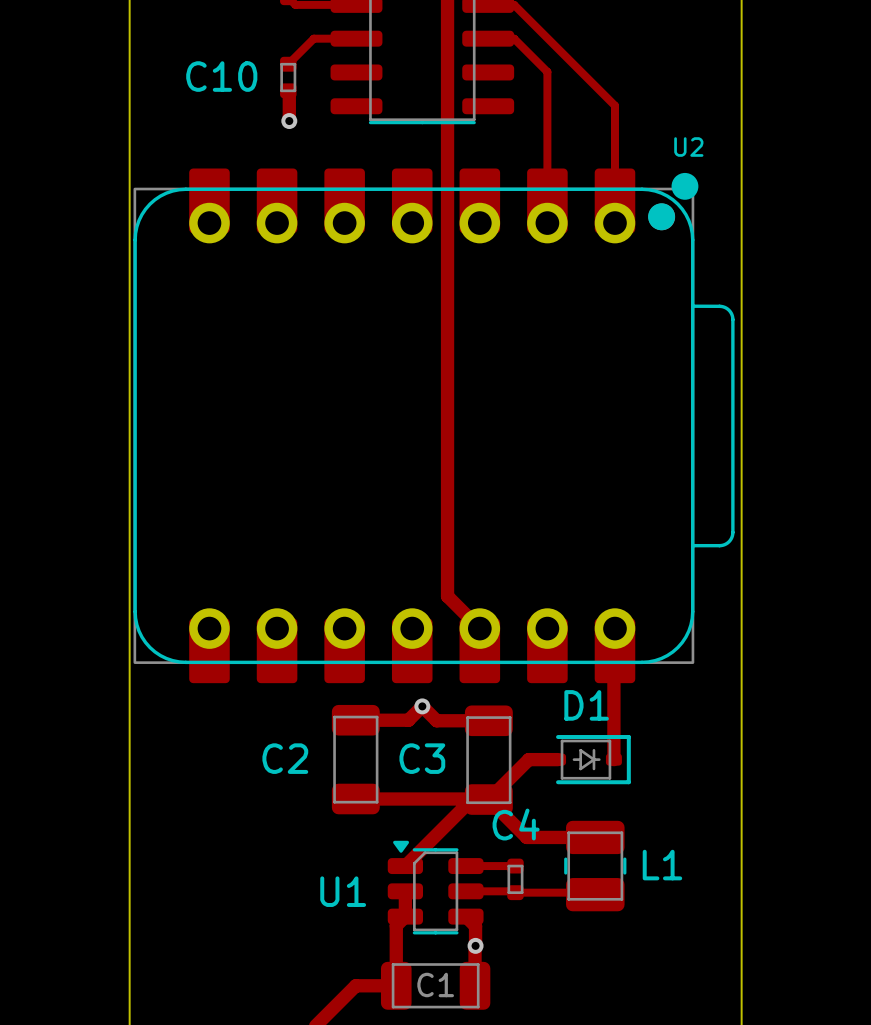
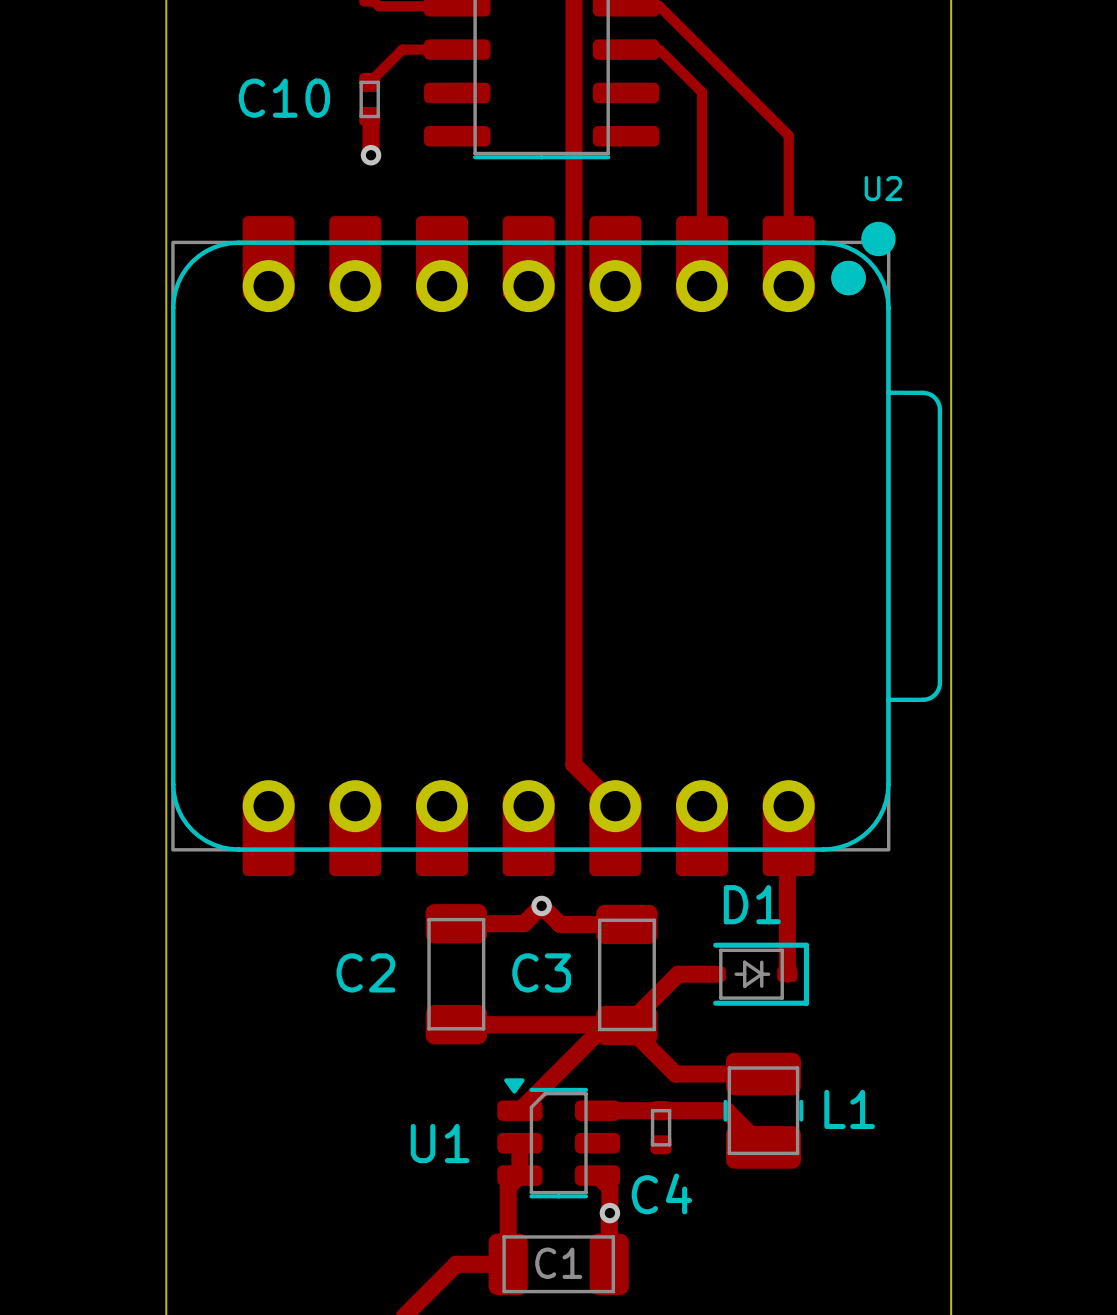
C4 name position: C4 (516, 824) -> C4 (661, 1193)
track width: thin (465, 866) (515, 866) -> thick (597, 1110) (661, 1110)
track: (465, 891) (593, 892) -> (661, 1110) (726, 1110) (760, 1144)

